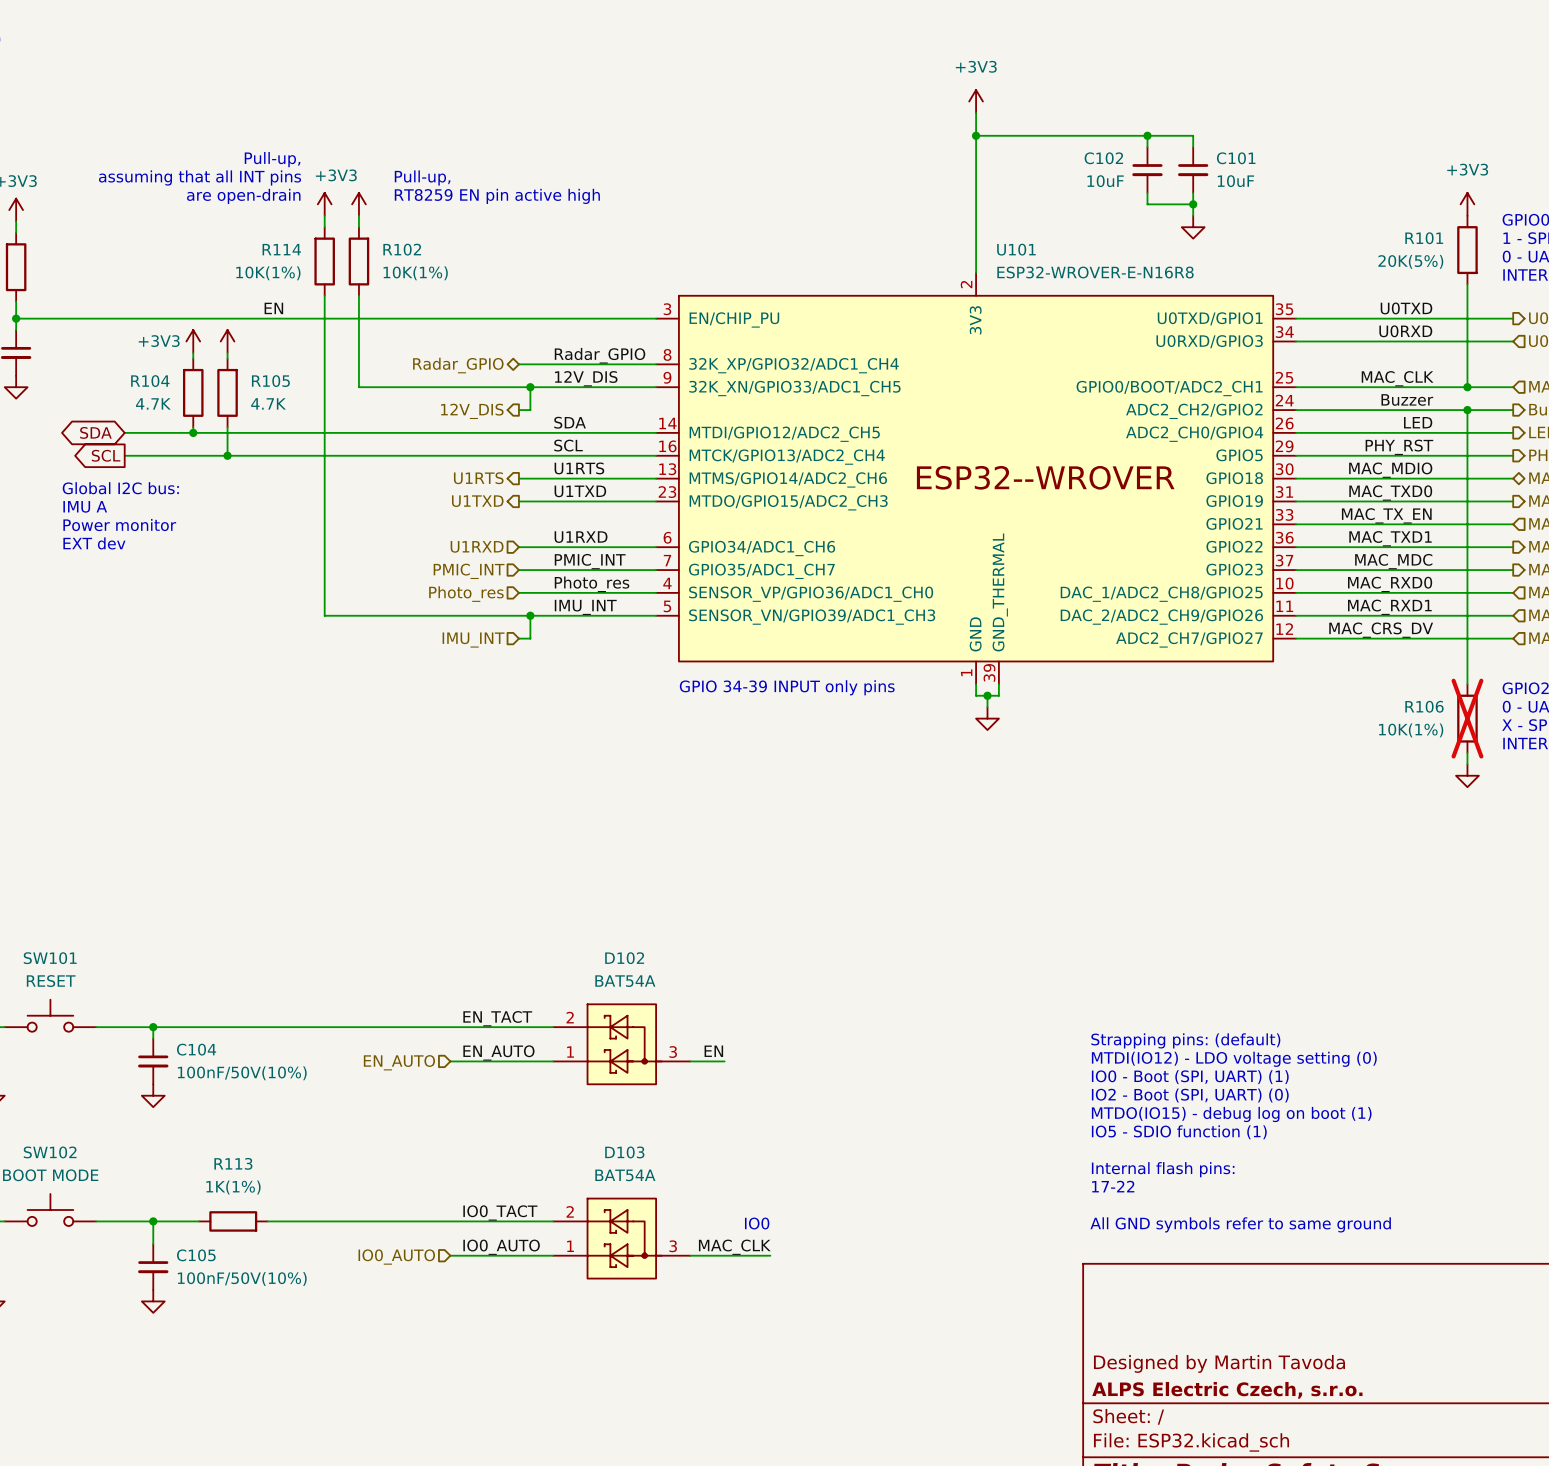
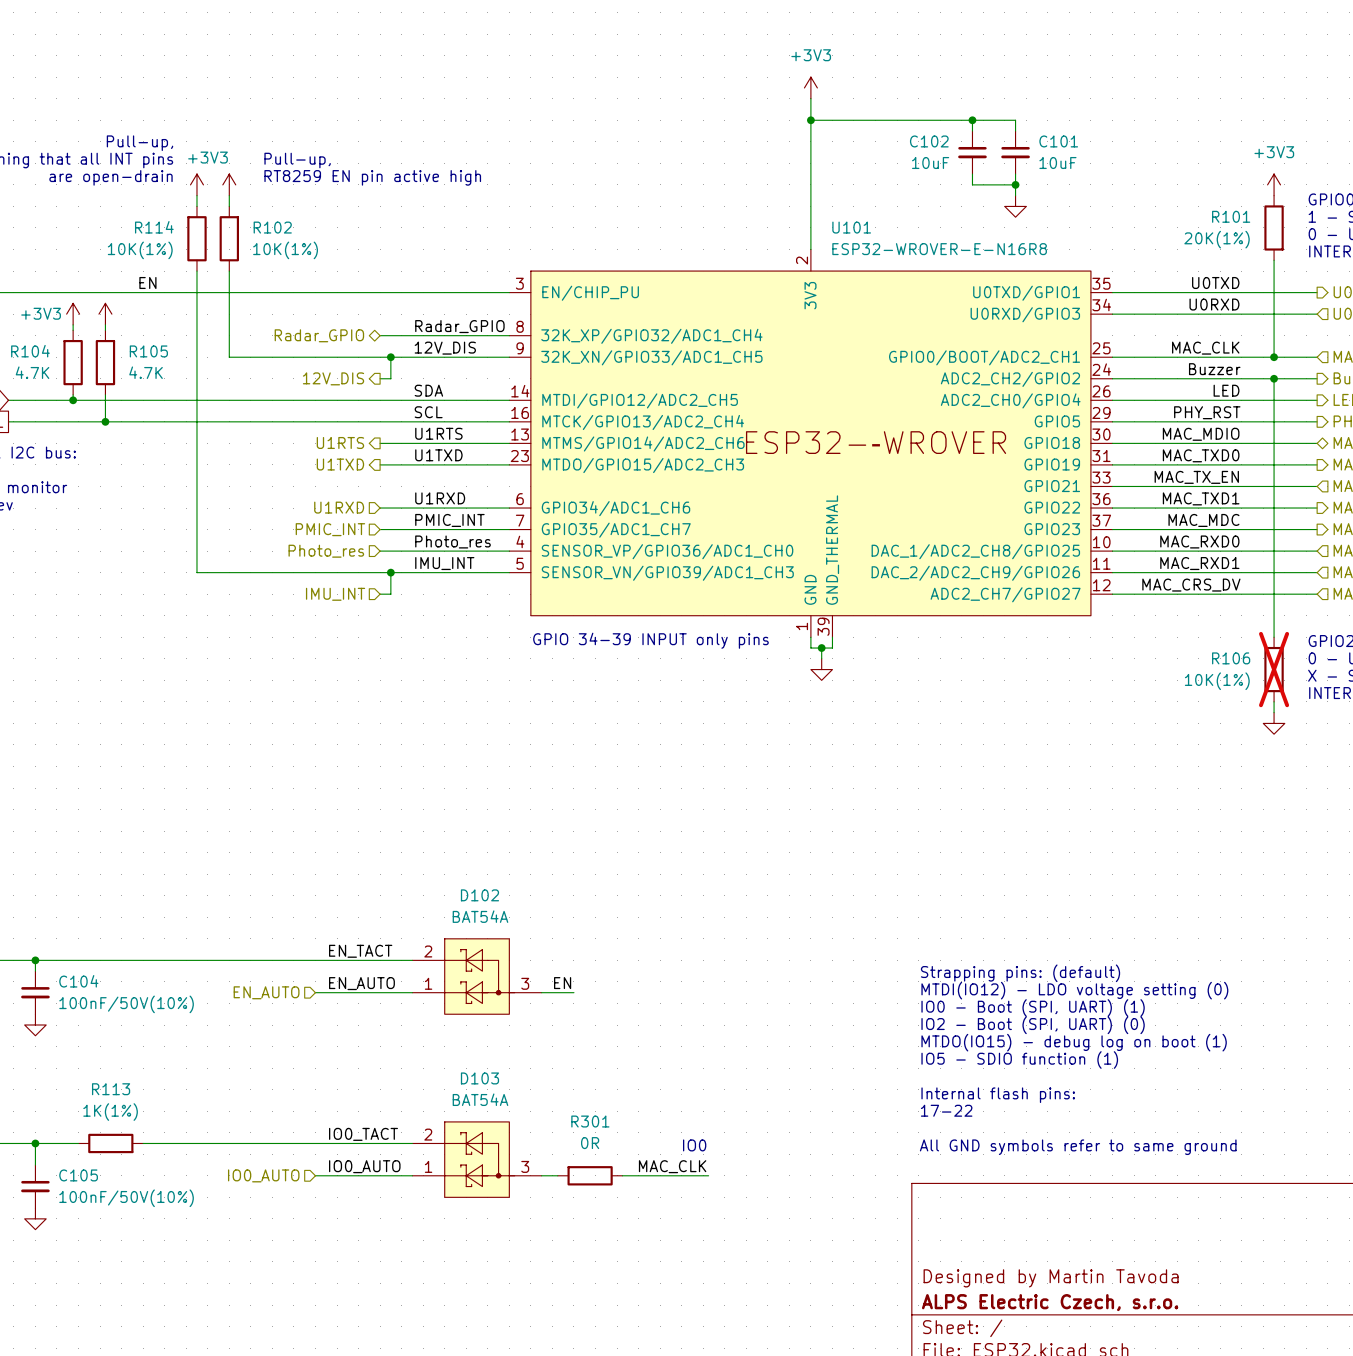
R101 value: 20K(5%) (1410, 261) -> 20K(1%) (1217, 239)
text position: IO0 (757, 1223) -> IO0 (694, 1145)
label position: MAC_CLK (734, 1247) -> MAC_CLK (672, 1166)
wire: (707, 1255) (770, 1255) -> none
R301: none -> 0R (590, 1175)
wire: none -> (622, 1175) (708, 1175)

